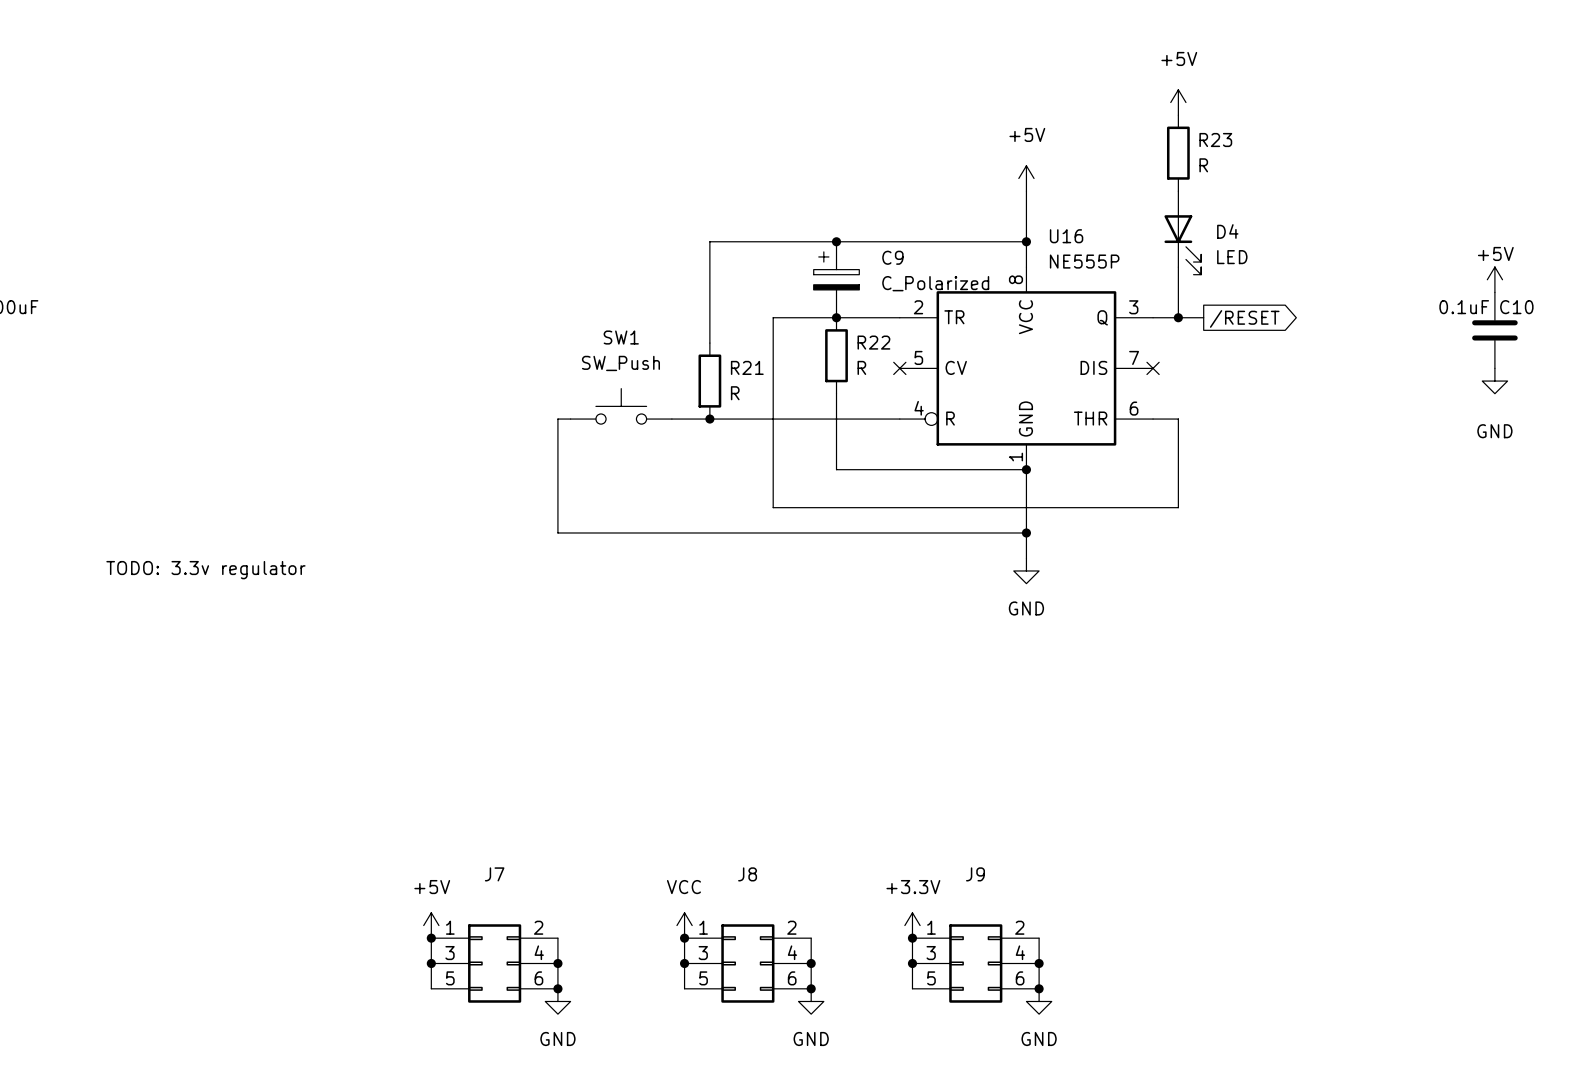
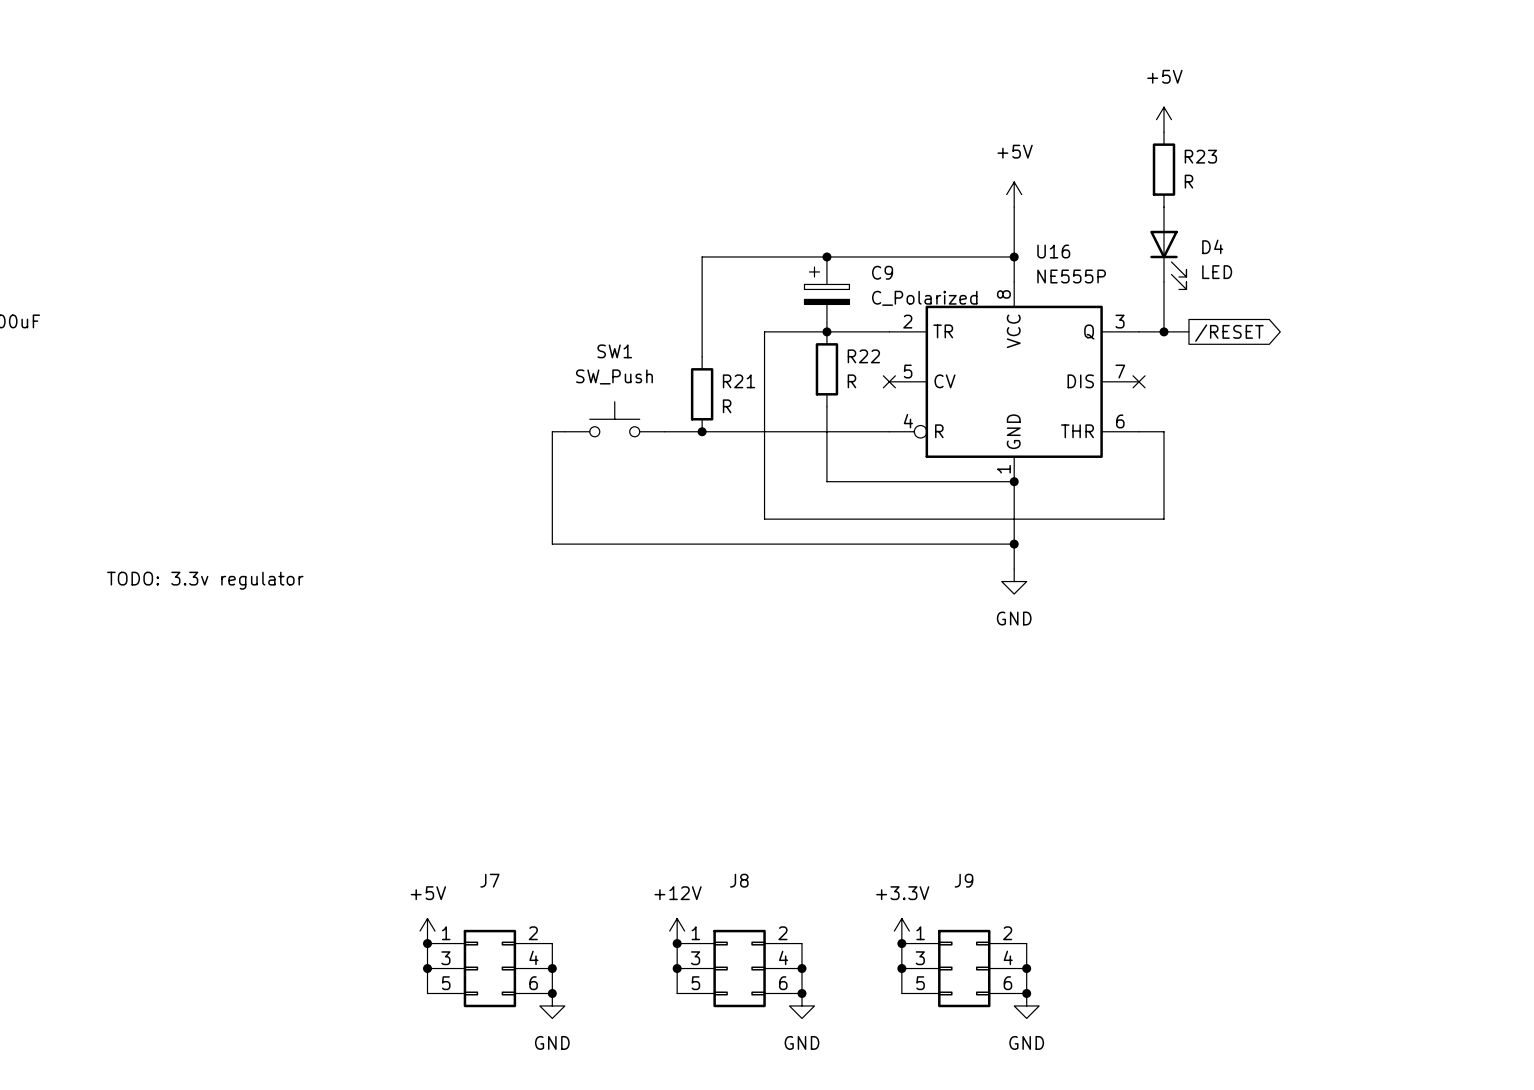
power symbol: +5V (1494, 279) -> none
C10: 0.1uF (1494, 330) -> none
power symbol: GND (1494, 381) -> none
power symbol: VCC (684, 925) -> +12V (677, 931)

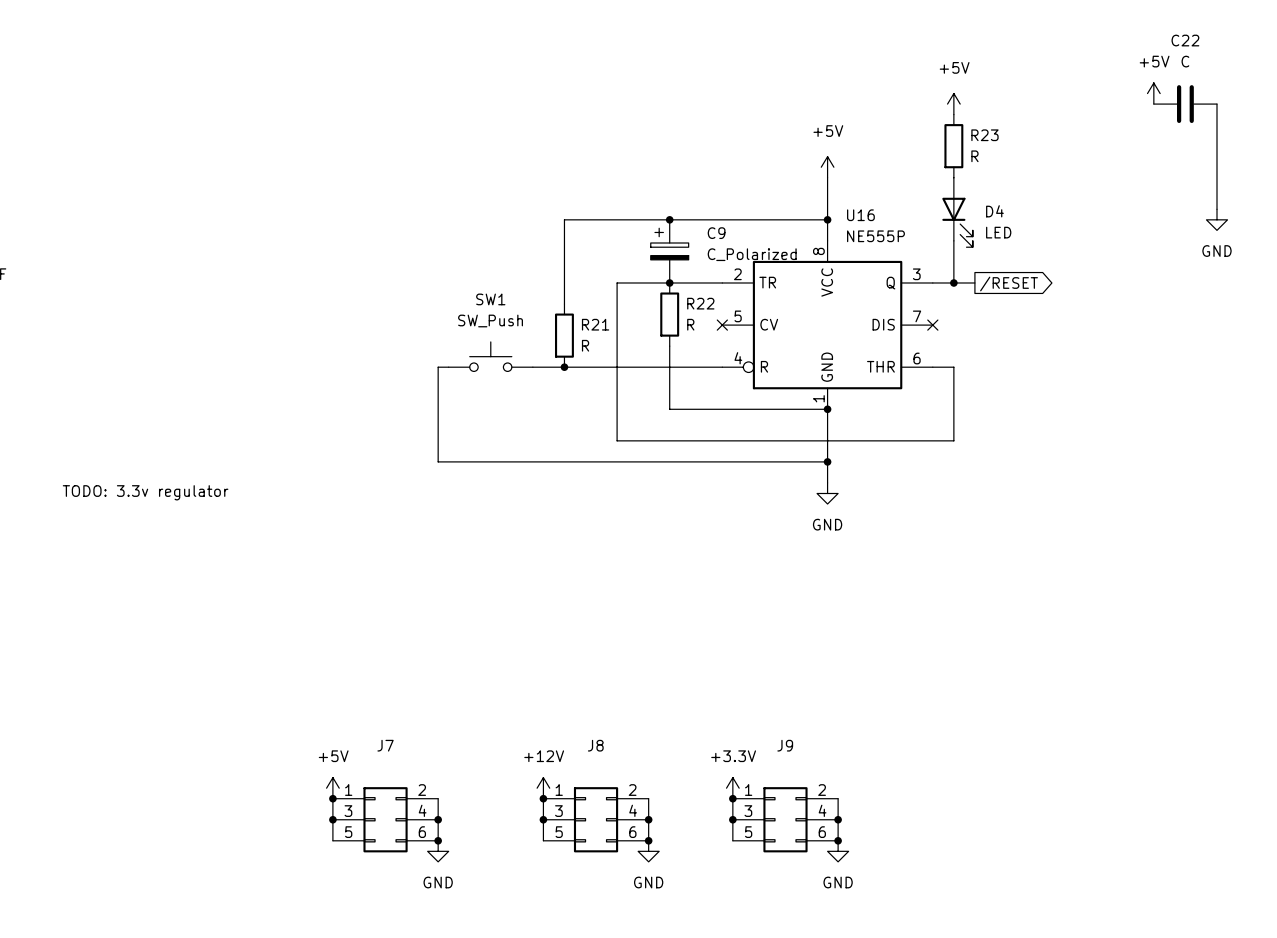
power symbol: none -> +5V (1153, 93)
C22: none -> C (1185, 104)
wire: none -> (1217, 104) (1217, 209)
power symbol: none -> GND (1217, 219)

